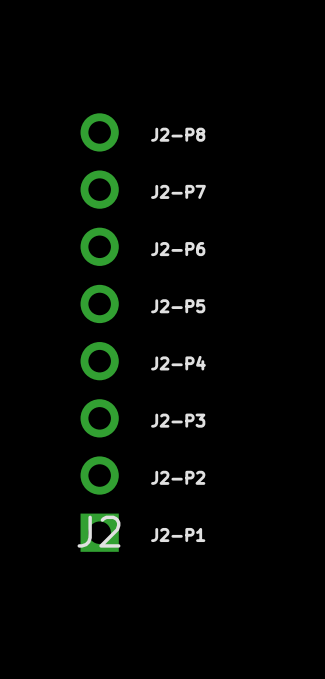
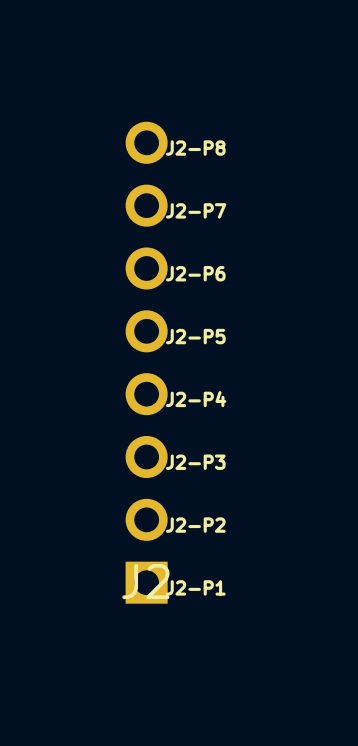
J2 position: (99, 332) -> (146, 362)

